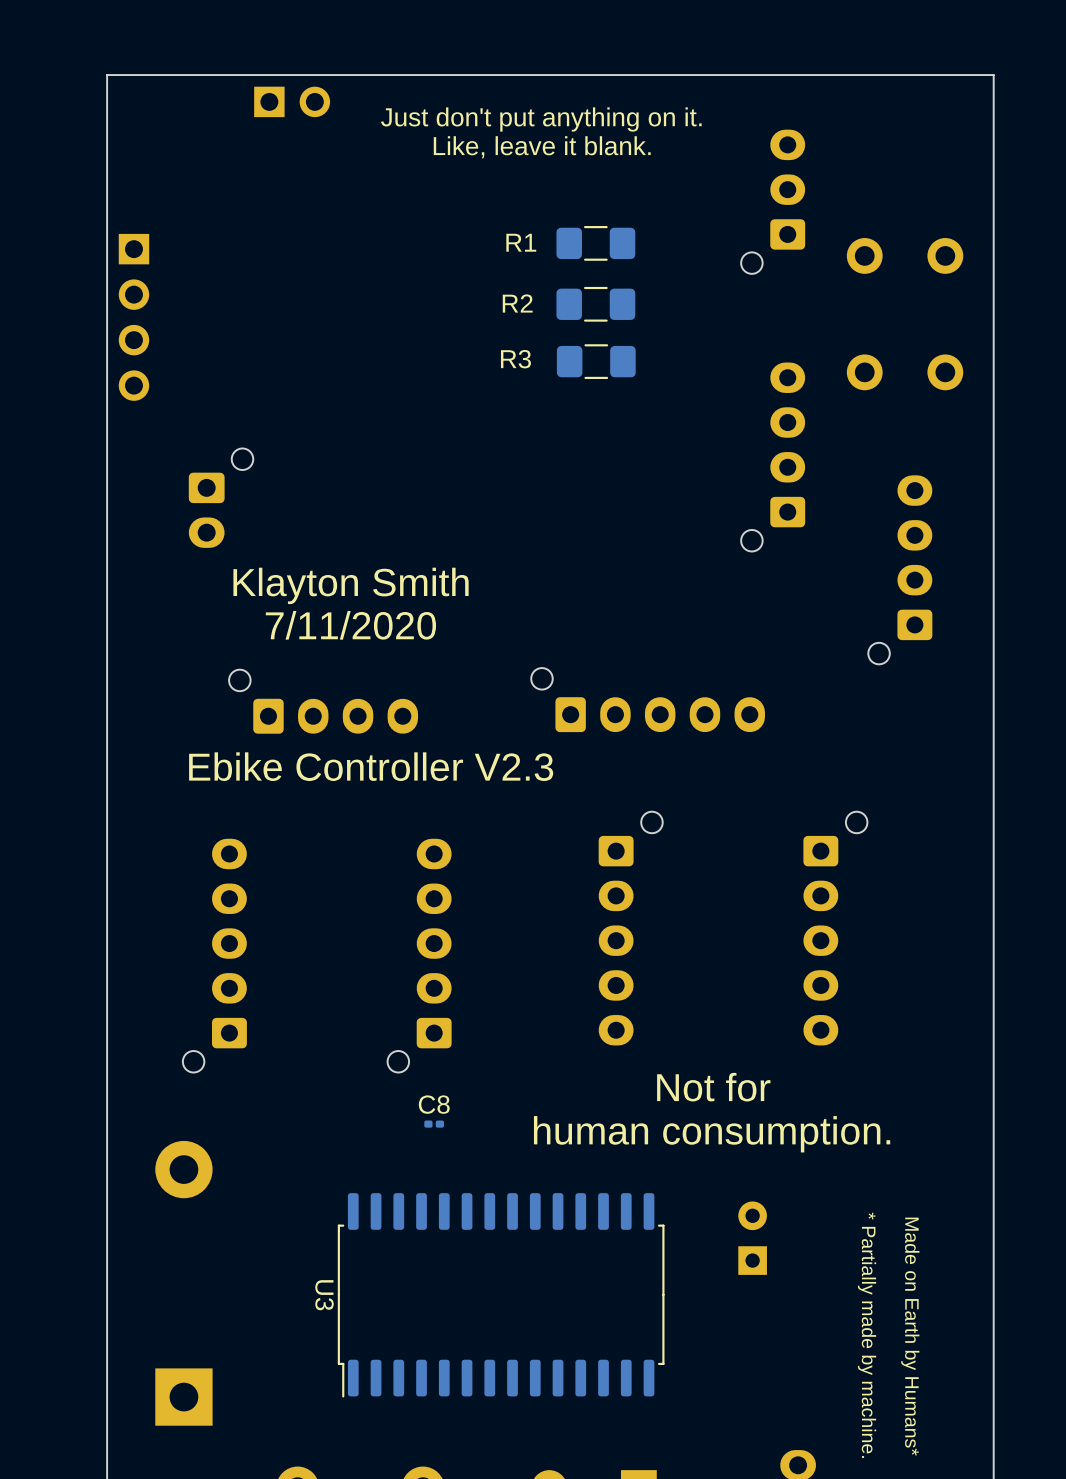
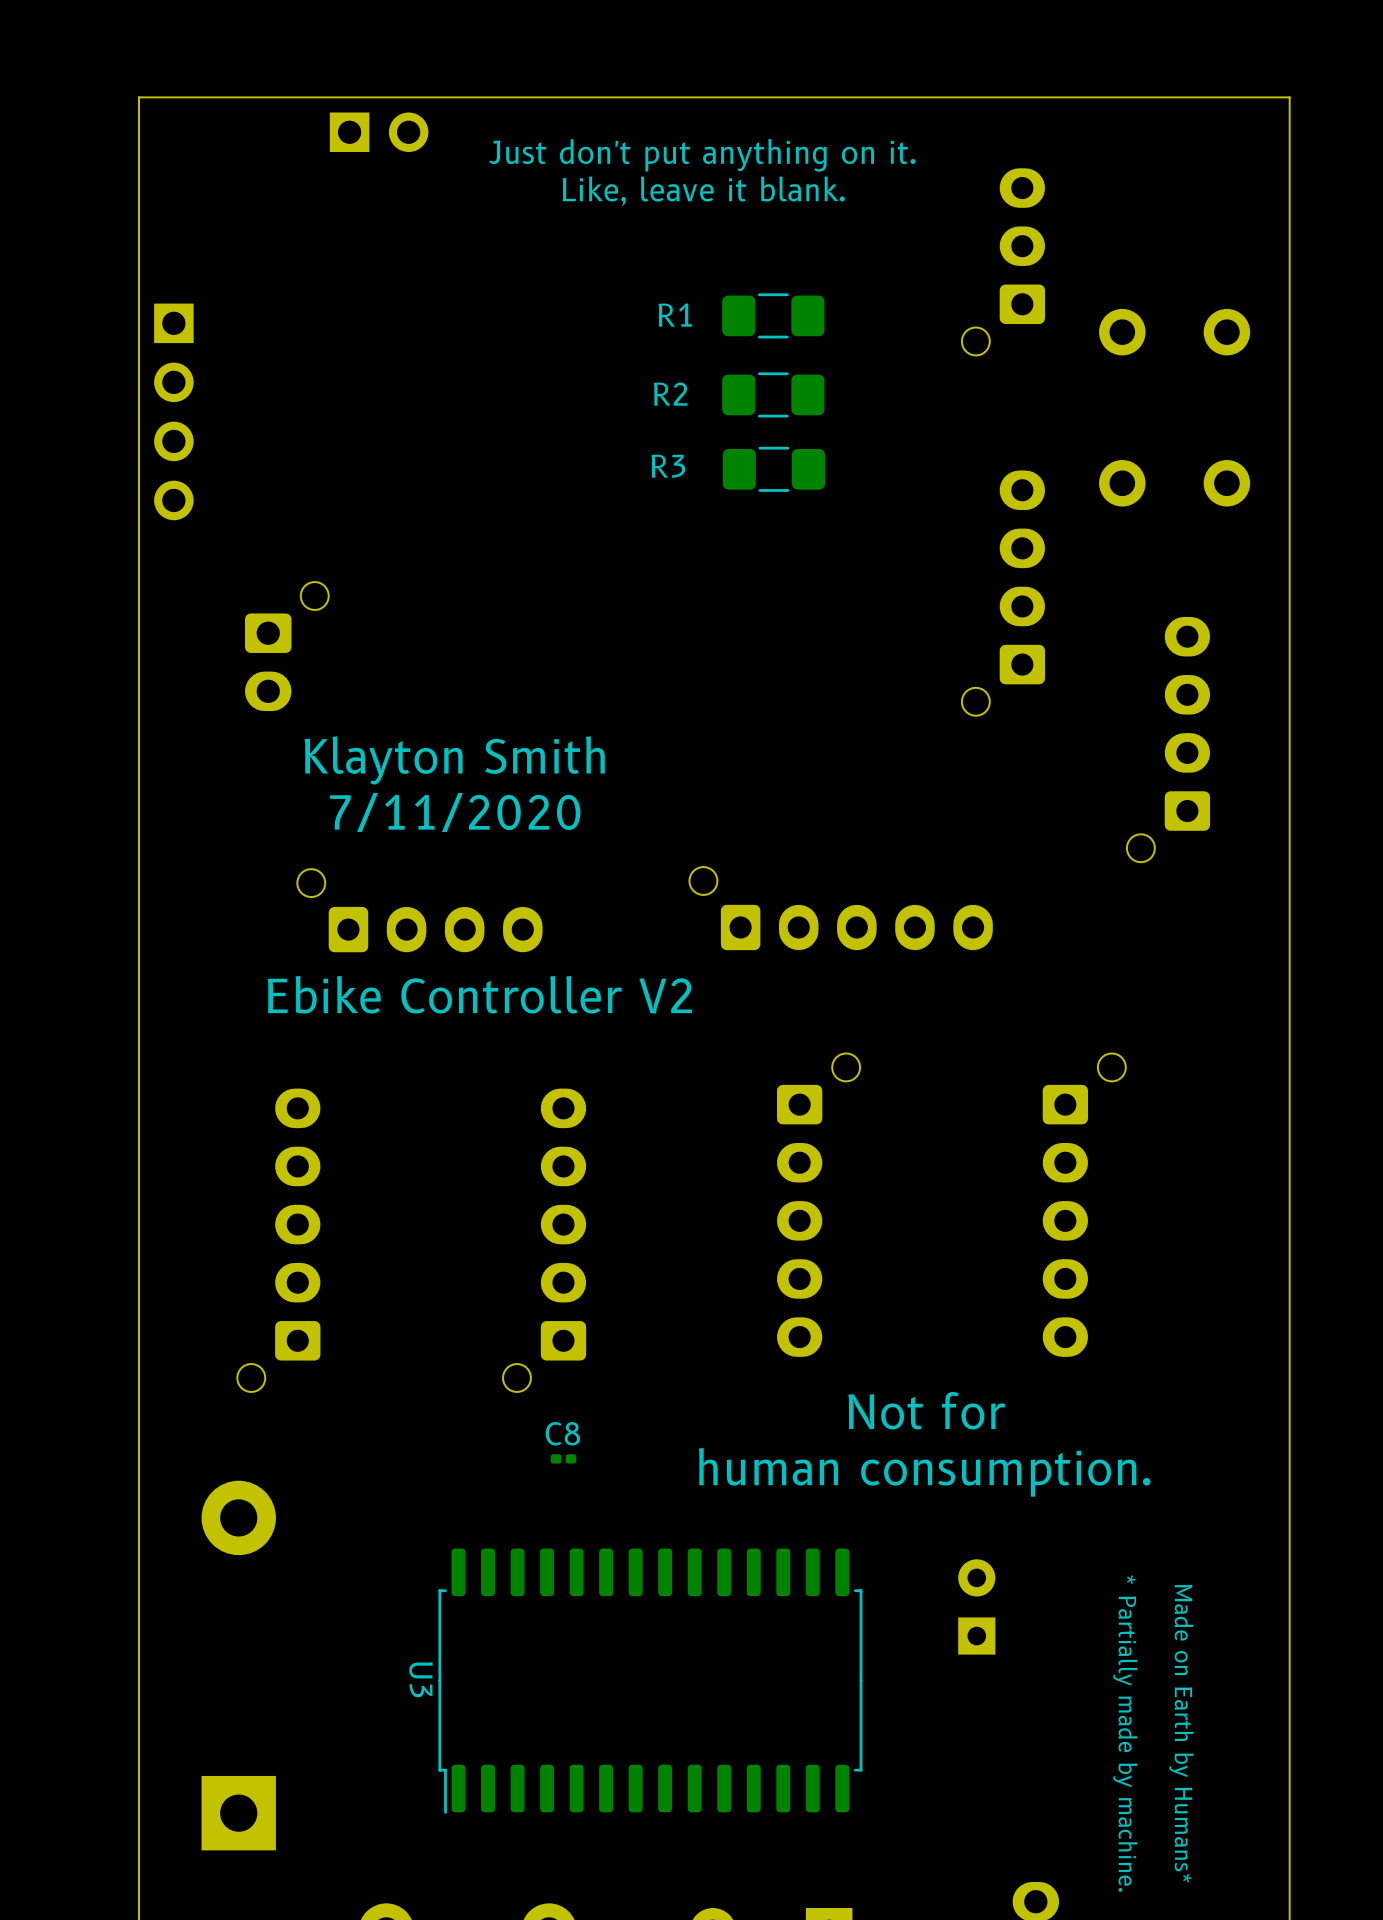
text: Ebike Controller V2.3 (371, 766) -> Ebike Controller V2 (479, 994)

